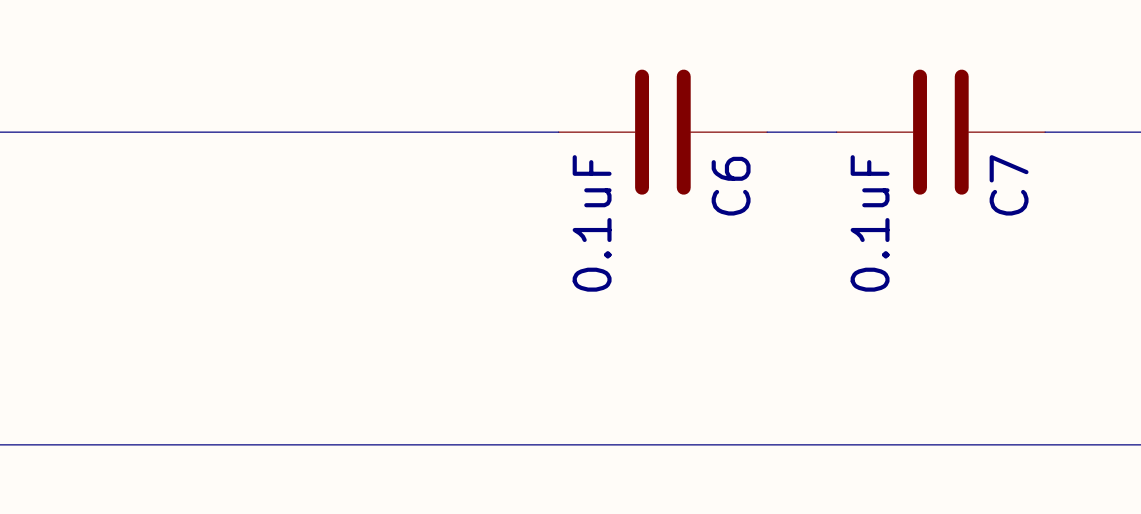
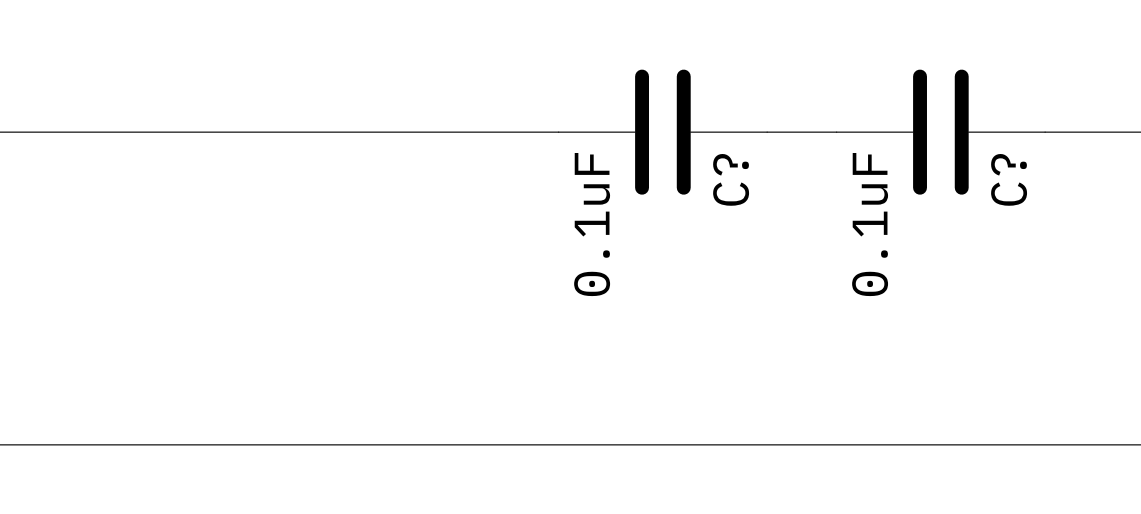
C7 name: C7 (1009, 185) -> C? (1009, 179)
C6 name: C6 (731, 186) -> C? (731, 179)

